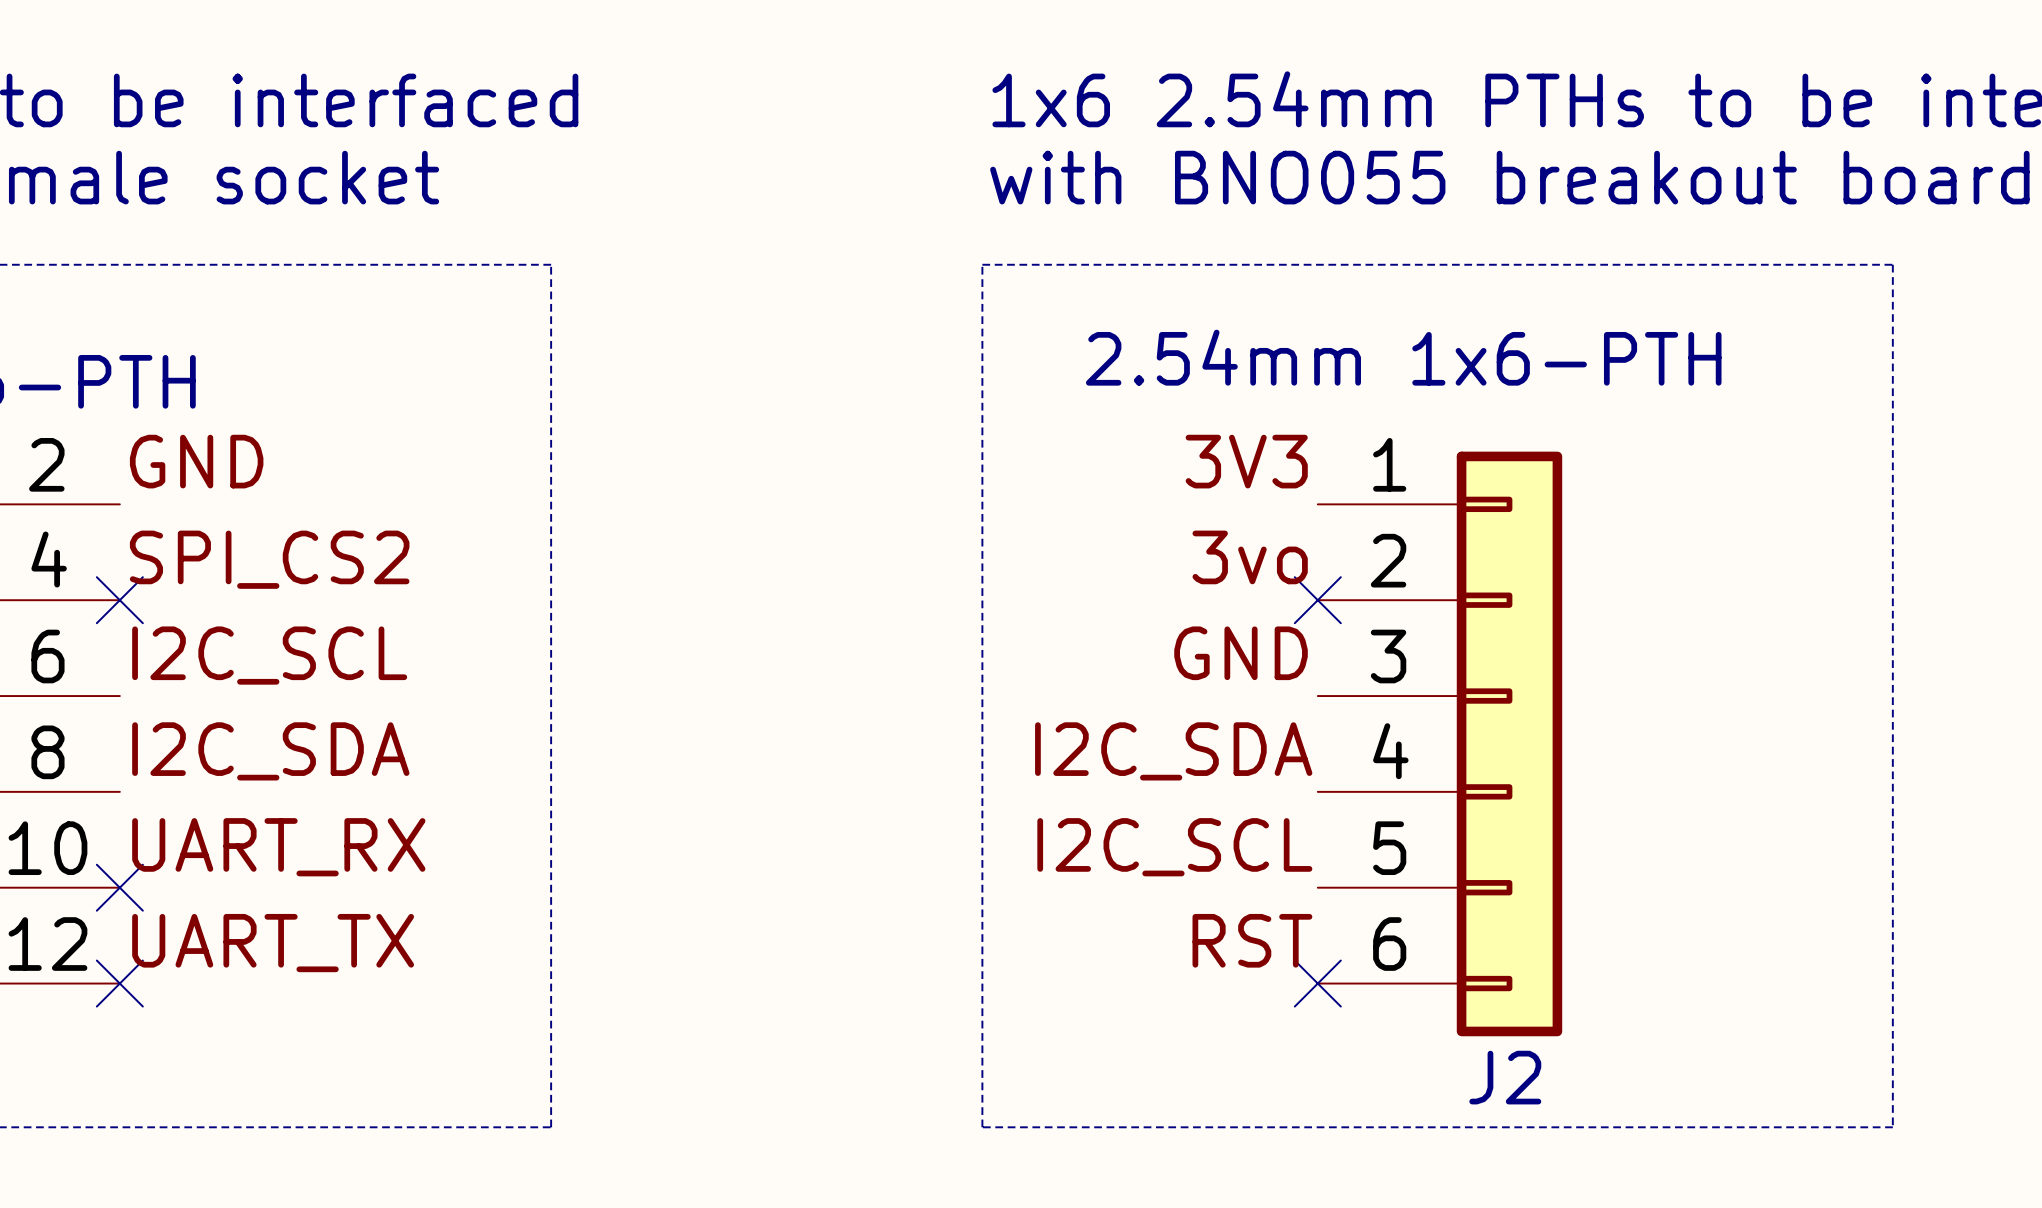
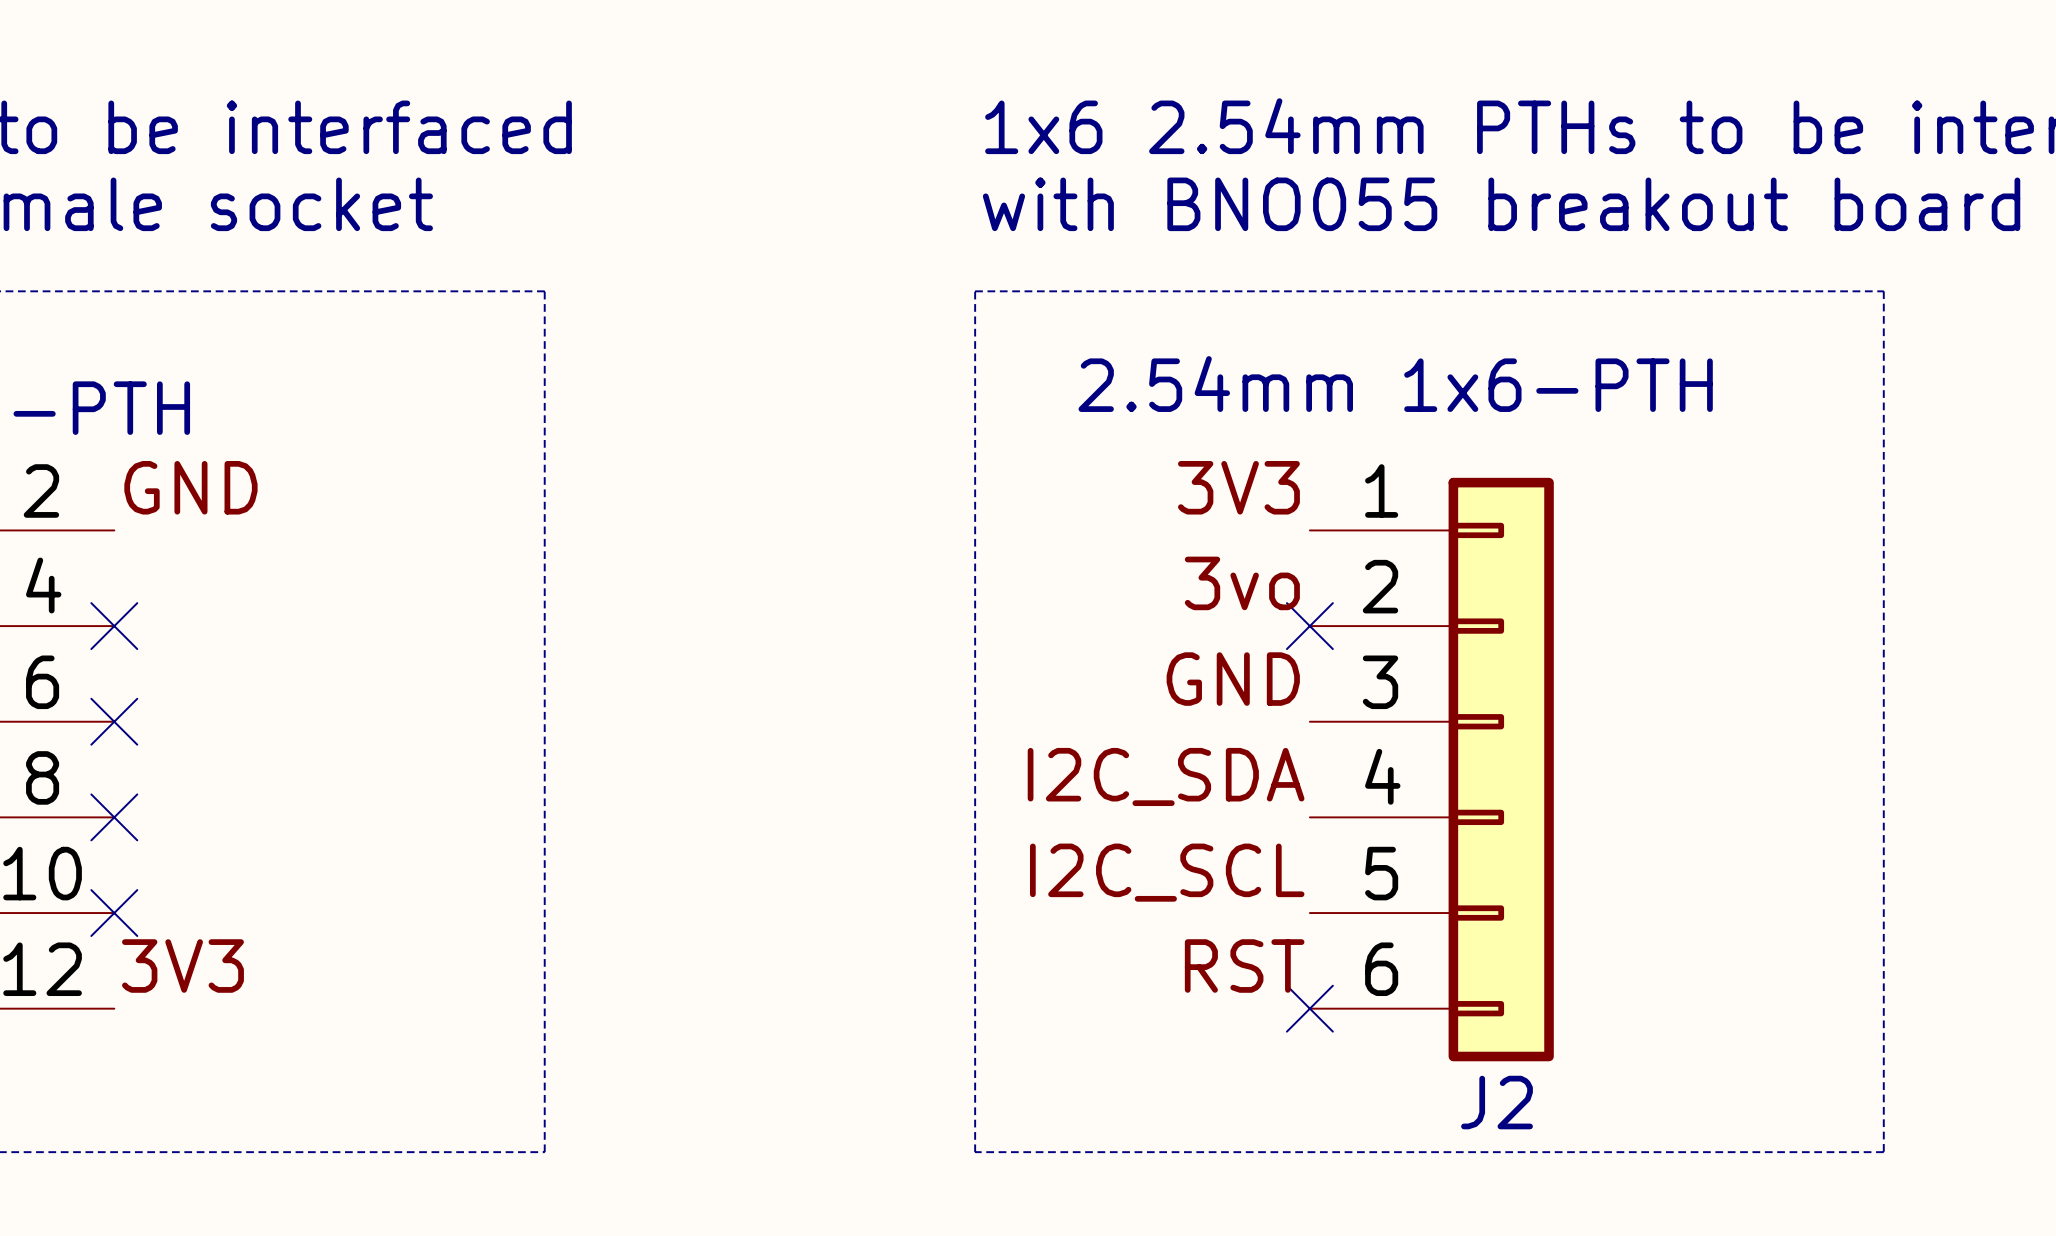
label: SPI_CS2 (269, 559) -> none
label: I2C_SCL (269, 655) -> none
no-connect mark: none -> (114, 721)
label: I2C_SDA (270, 751) -> none
no-connect mark: none -> (114, 817)
label: UART_RX (278, 847) -> none
label: UART_TX (273, 943) -> 3V3 (182, 966)
no-connect mark: (119, 983) -> none

